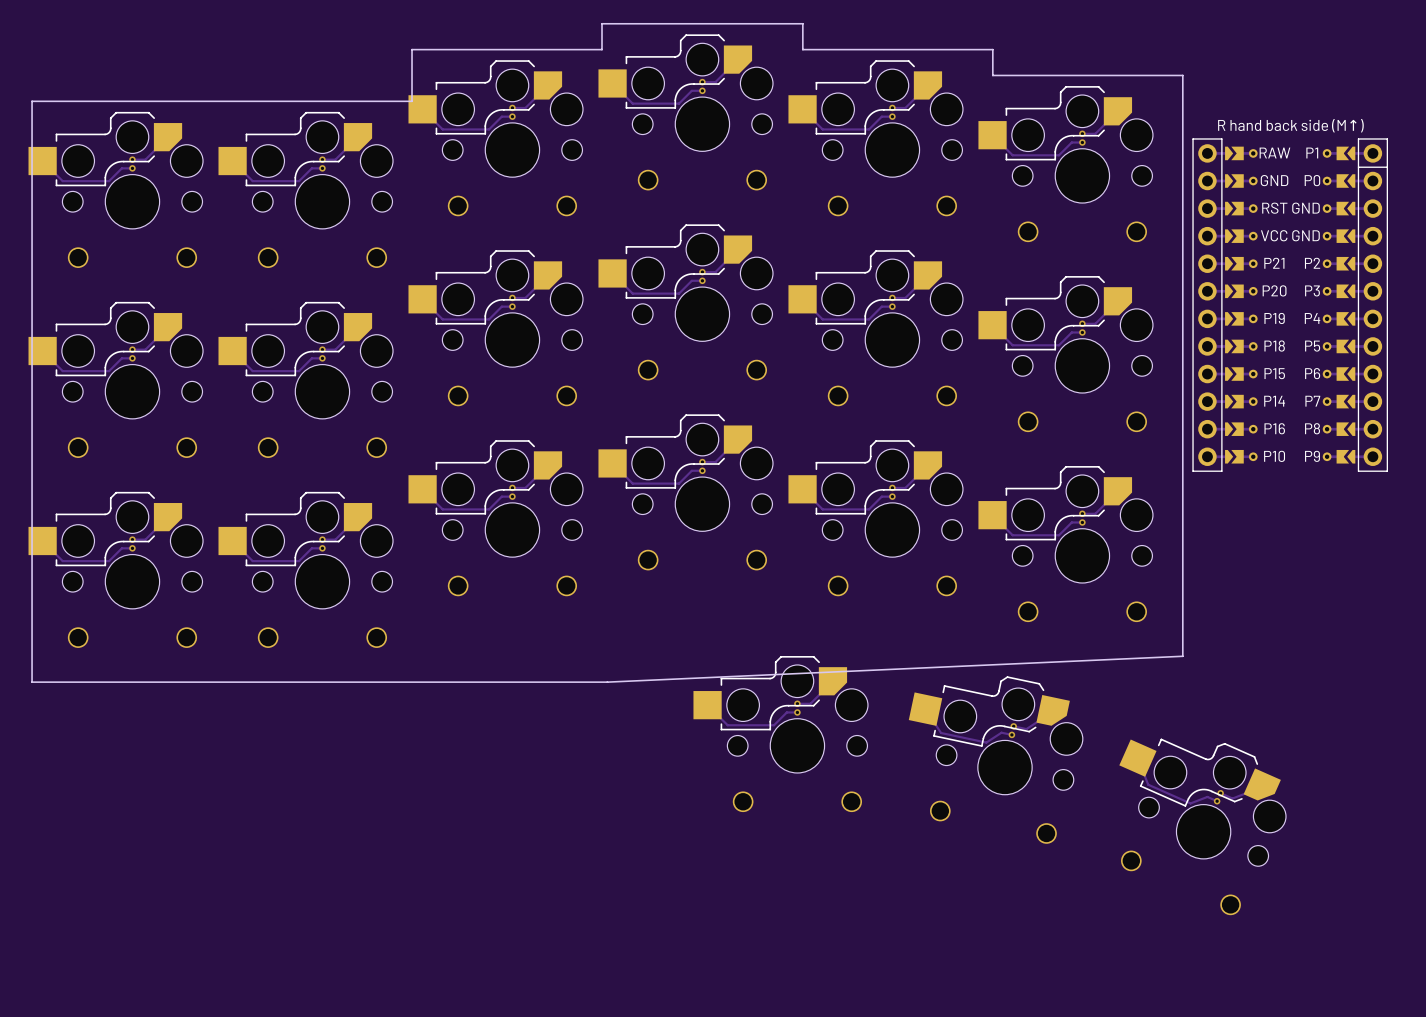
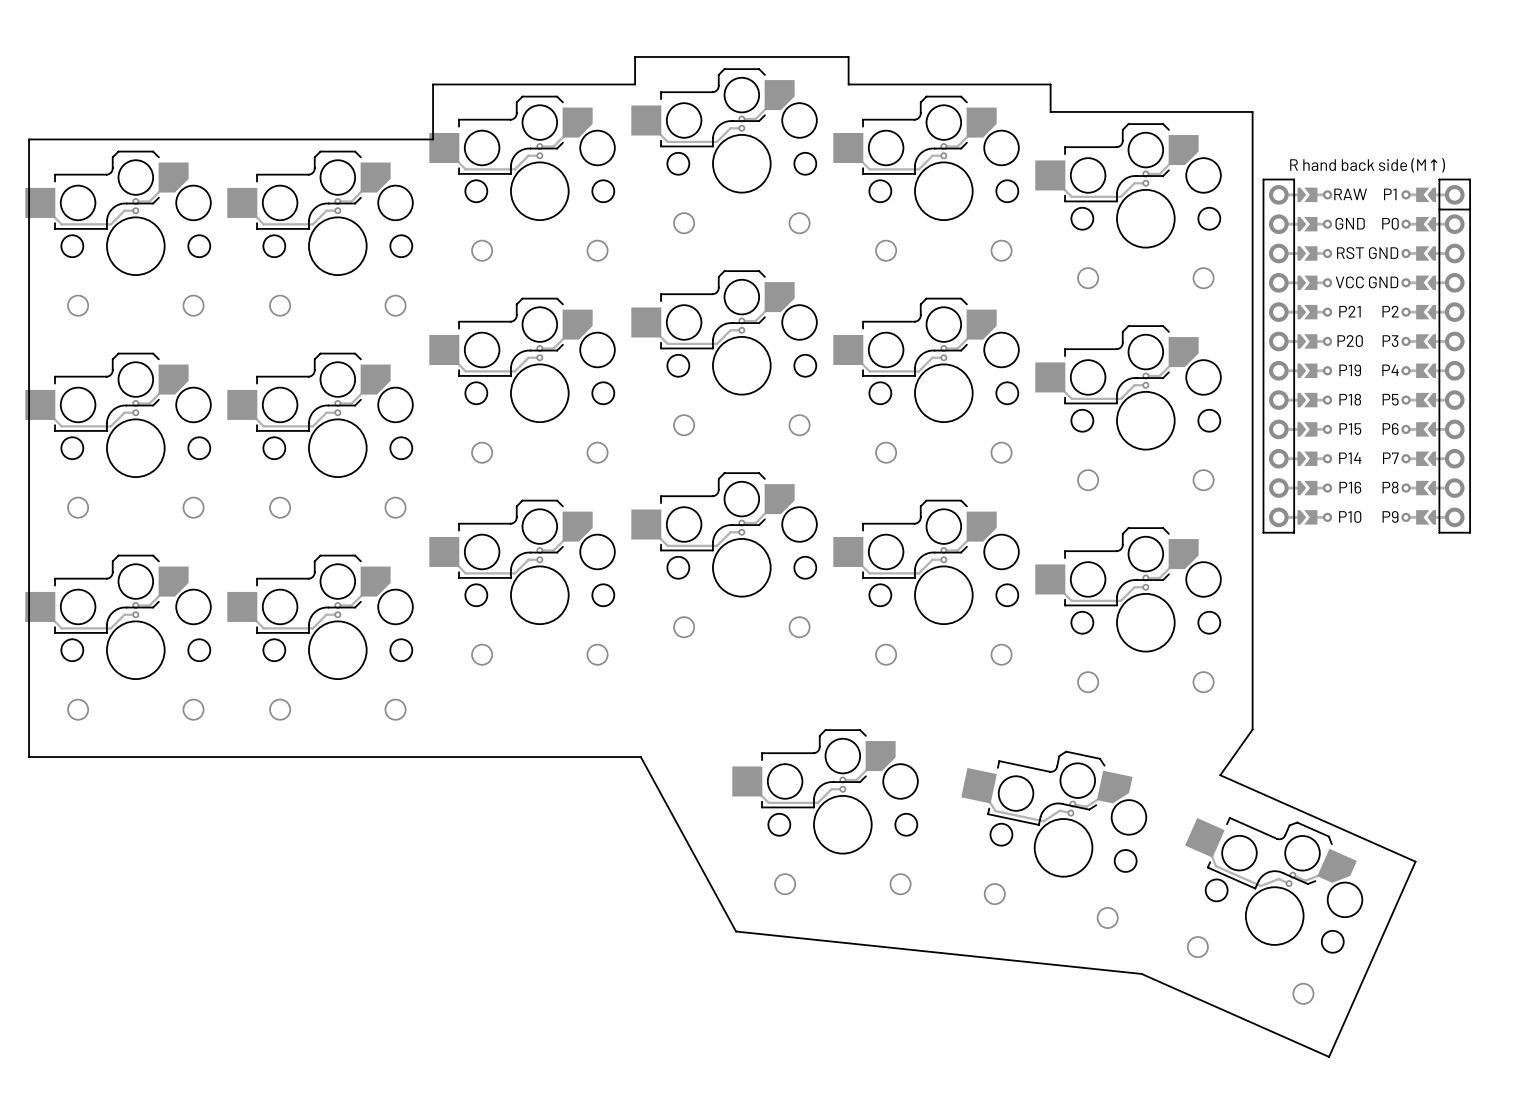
board edge: (1182, 656) (607, 682) -> (1252, 729) (1220, 775) (1415, 861) (1329, 1056) (1141, 973) (736, 931) (640, 757)

